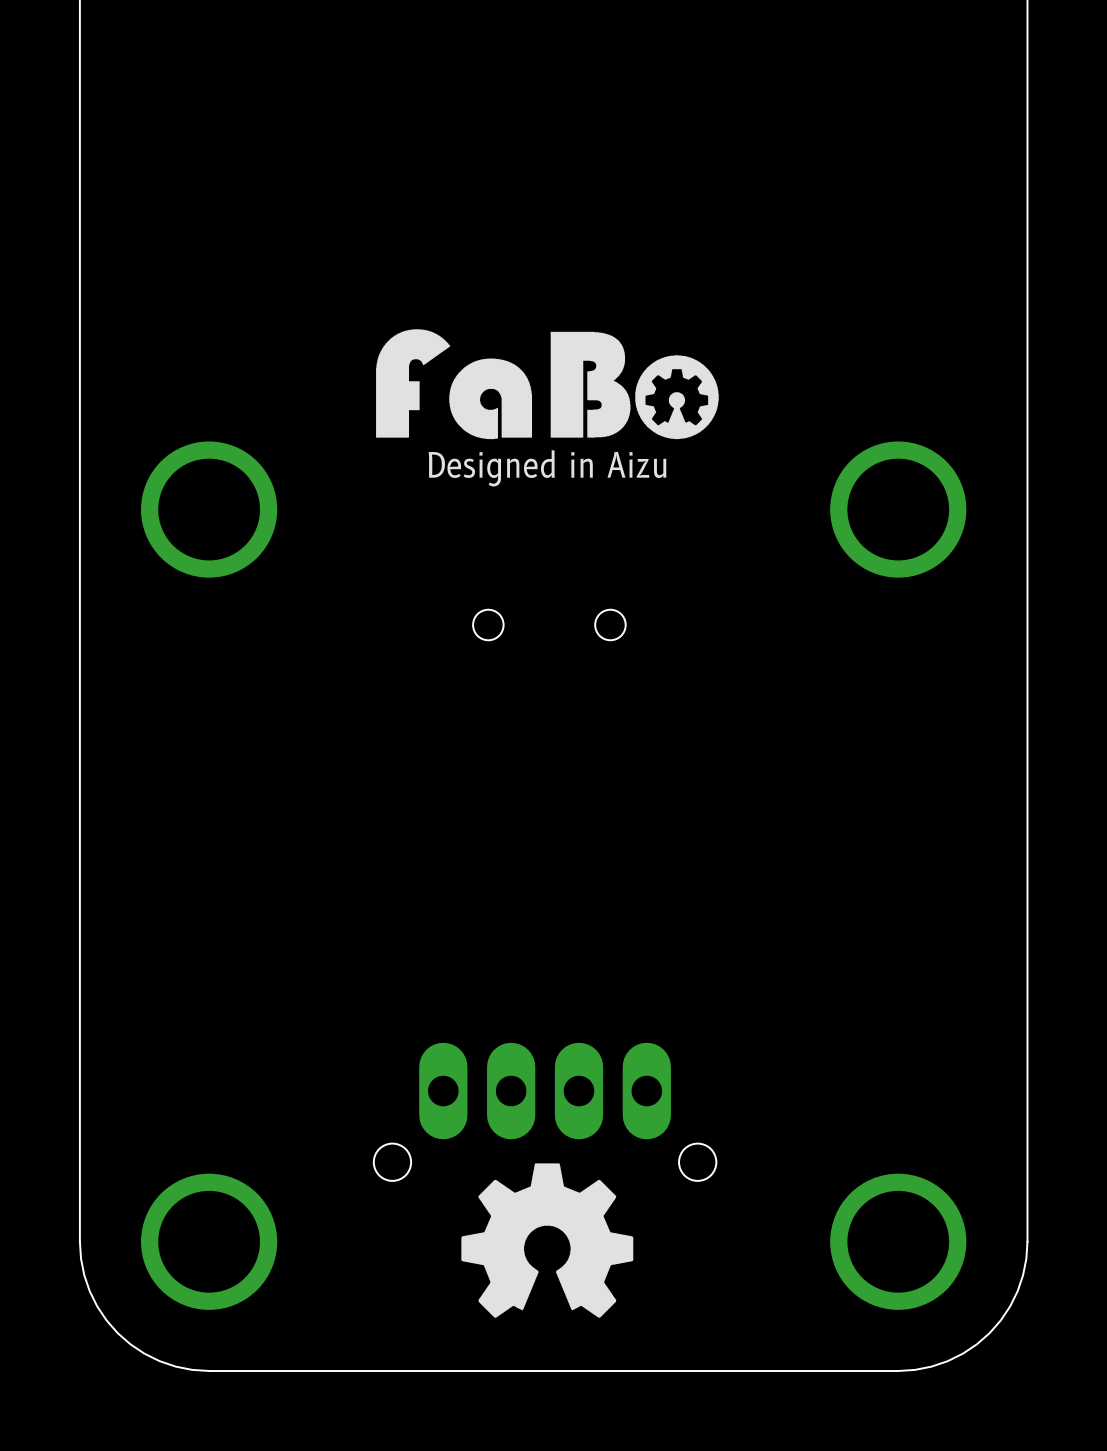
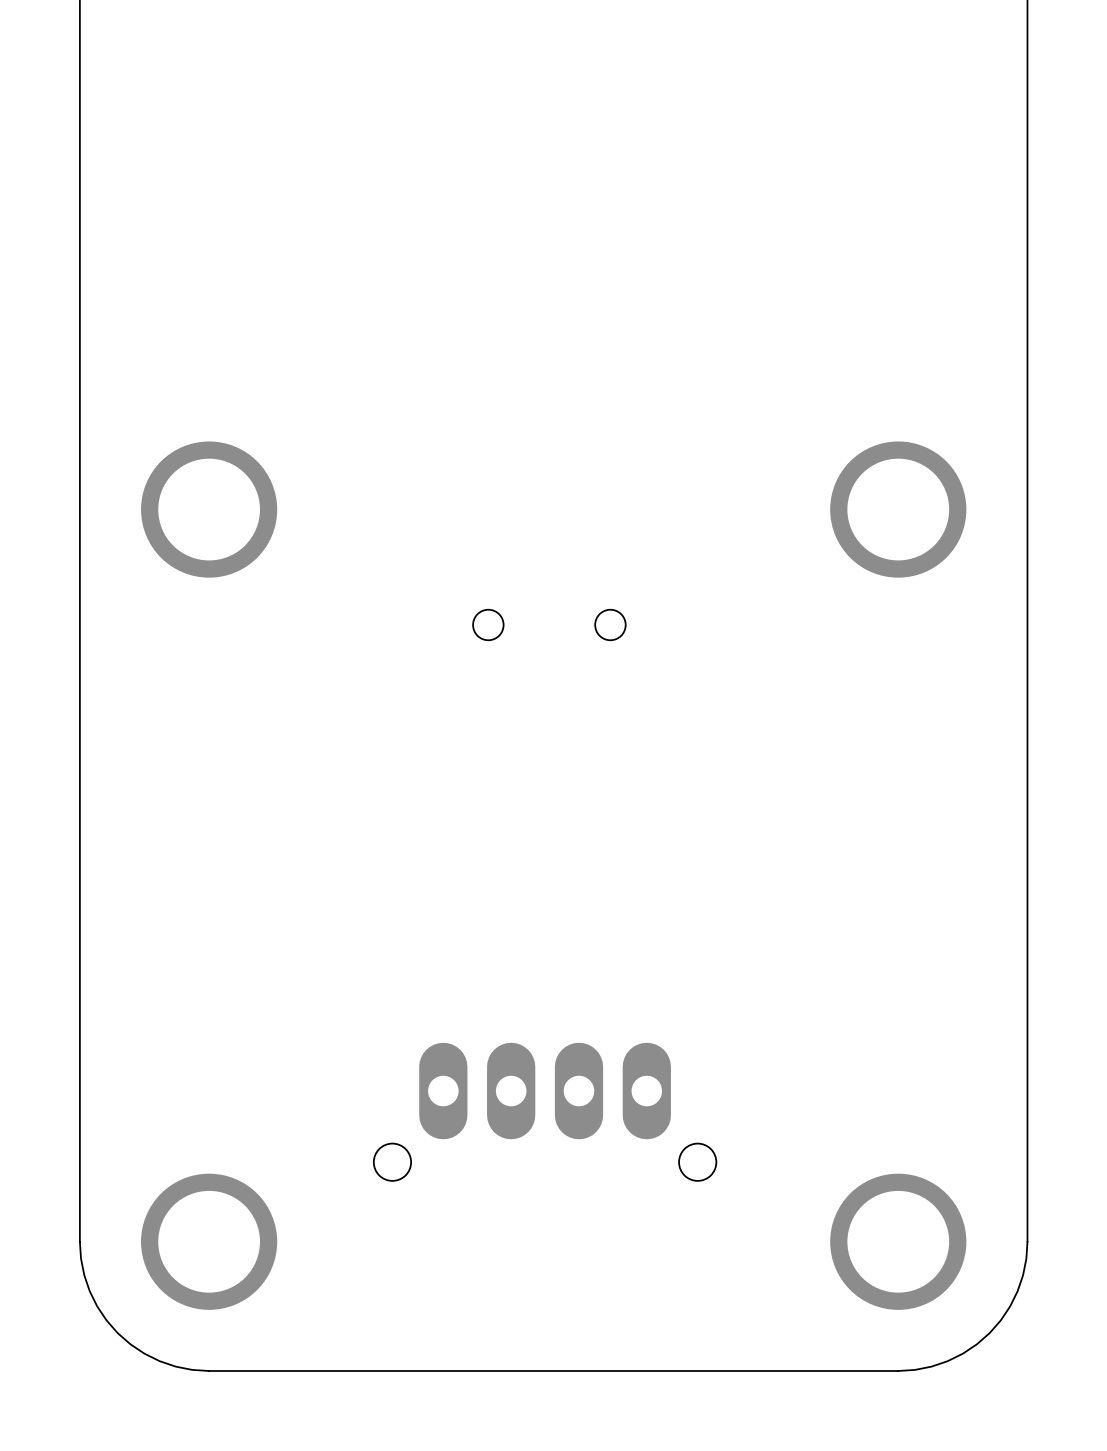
drawing: [376, 329, 719, 440] -> none
text: Designed in Aizu (547, 468) -> none
drawing: [461, 1163, 634, 1318] -> none

